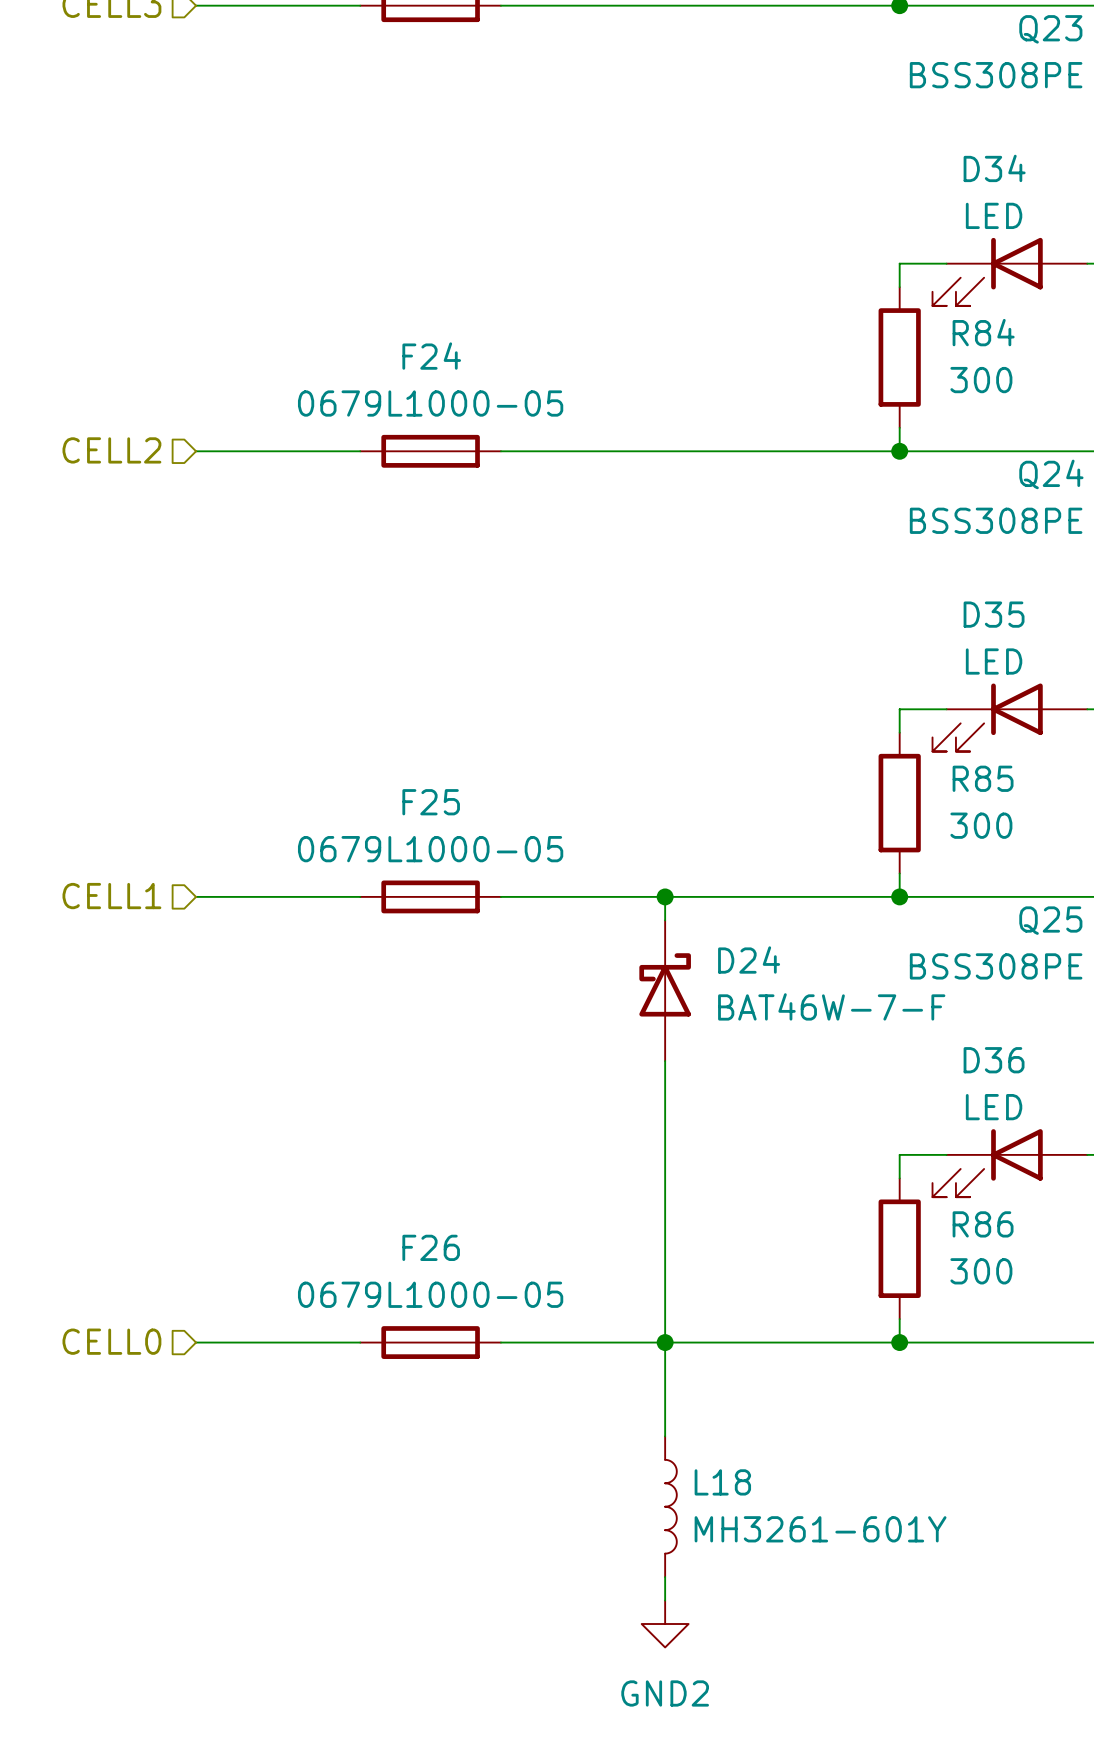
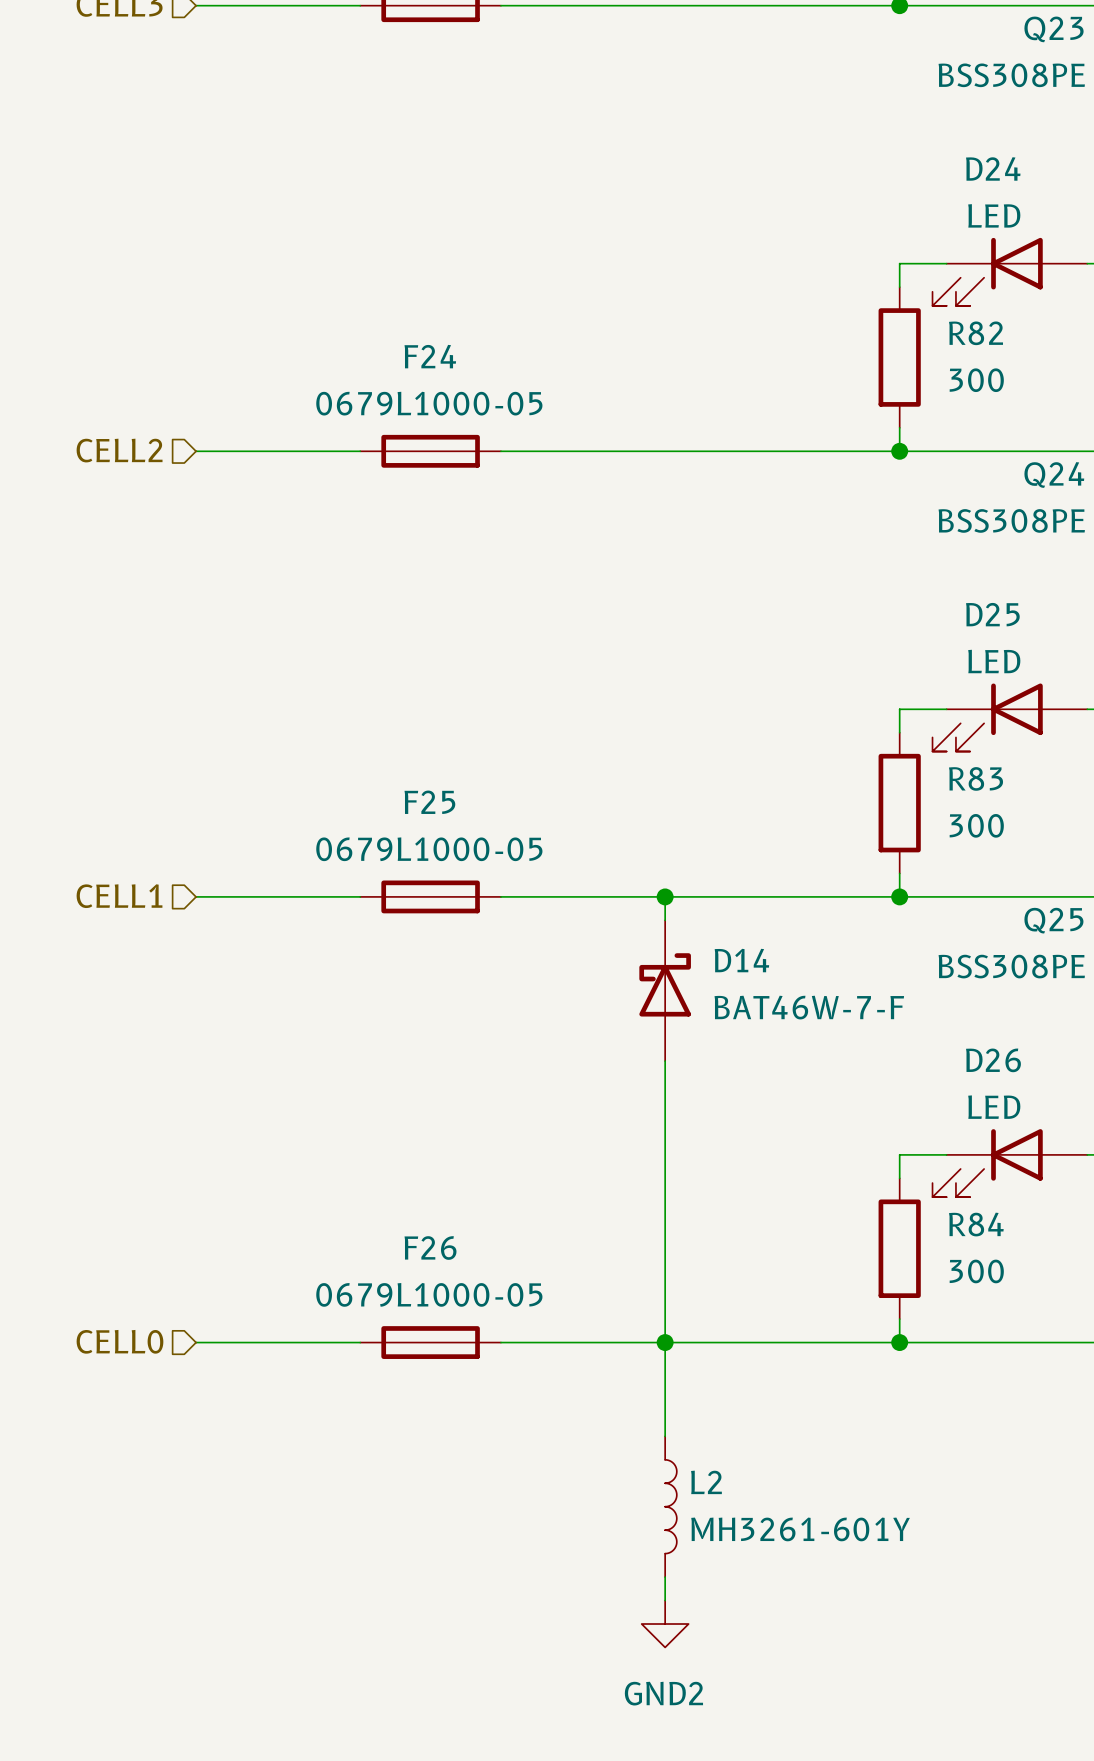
D34 name: D34 (994, 168) -> D24 (993, 168)
R84 name: R84 (983, 332) -> R82 (975, 333)
D35 name: D35 (994, 614) -> D25 (992, 614)
R85 name: R85 (983, 778) -> R83 (976, 778)
D24 name: D24 (749, 959) -> D14 (741, 960)
D36 name: D36 (994, 1060) -> D26 (993, 1060)
R86 name: R86 (983, 1224) -> R84 (976, 1224)
L18 name: L18 (722, 1482) -> L2 (706, 1482)

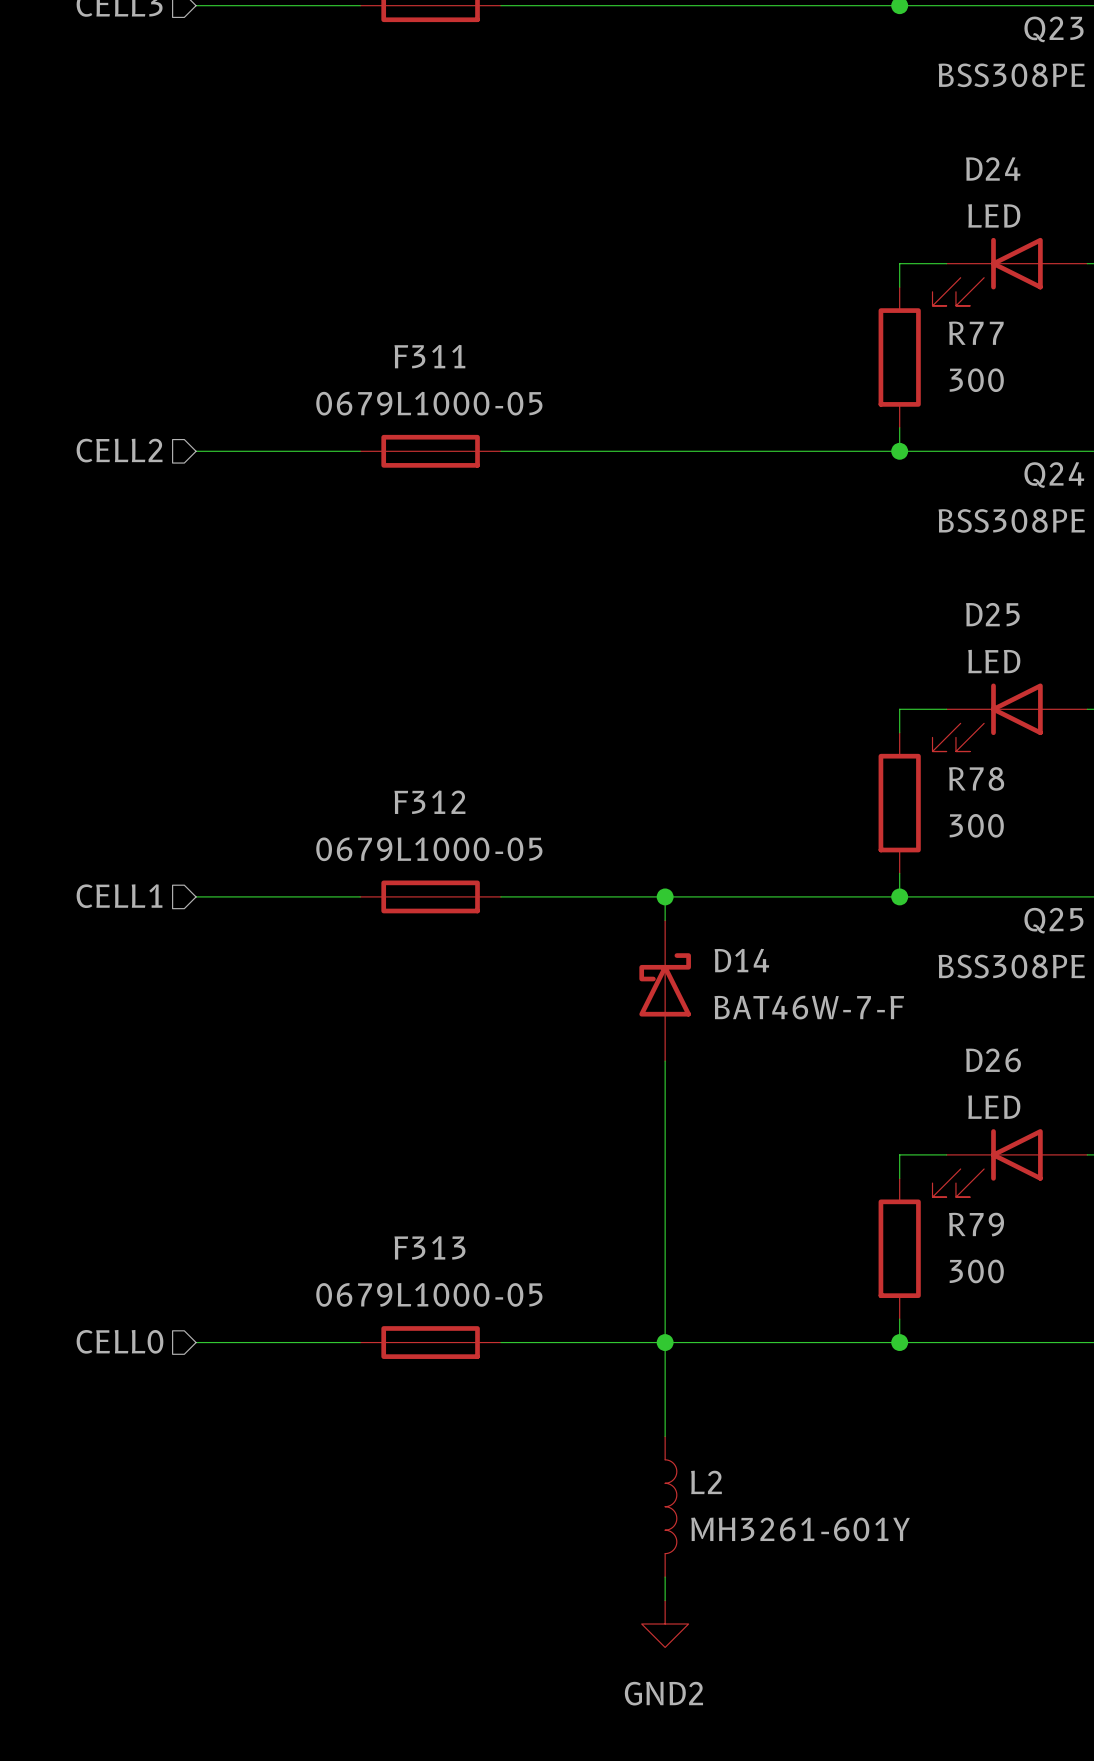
R82 name: R82 (975, 333) -> R77 (976, 333)
F24 name: F24 (430, 356) -> F311 (429, 356)
R83 name: R83 (976, 778) -> R78 (976, 778)
F25 name: F25 (429, 802) -> F312 (429, 802)
R84 name: R84 (976, 1224) -> R79 (976, 1224)
F26 name: F26 (430, 1248) -> F313 (429, 1247)

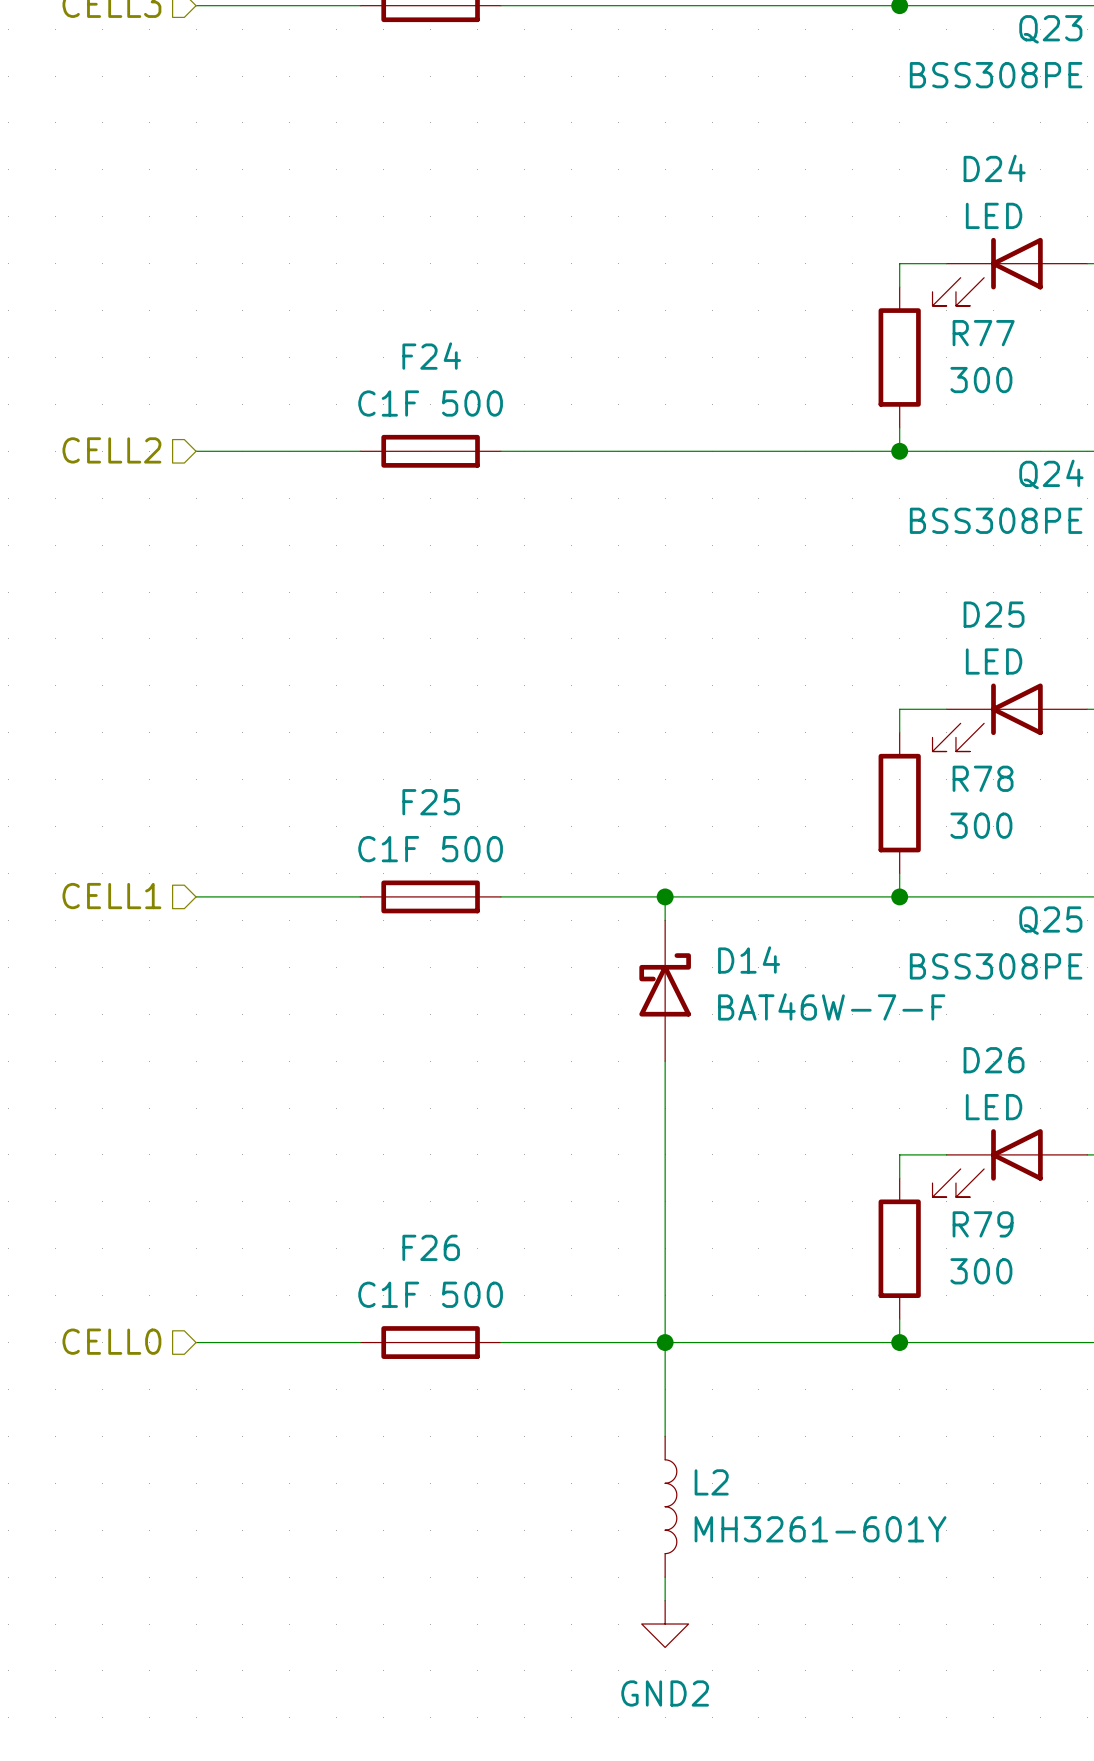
F311 name: F311 (429, 356) -> F24 (431, 356)
F311 value: 0679L1000-05 (429, 403) -> C1F 500 (430, 403)
F312 name: F312 (429, 802) -> F25 (431, 802)
F312 value: 0679L1000-05 (429, 849) -> C1F 500 (430, 849)
F313 name: F313 (429, 1247) -> F26 (431, 1247)
F313 value: 0679L1000-05 (429, 1294) -> C1F 500 (430, 1294)

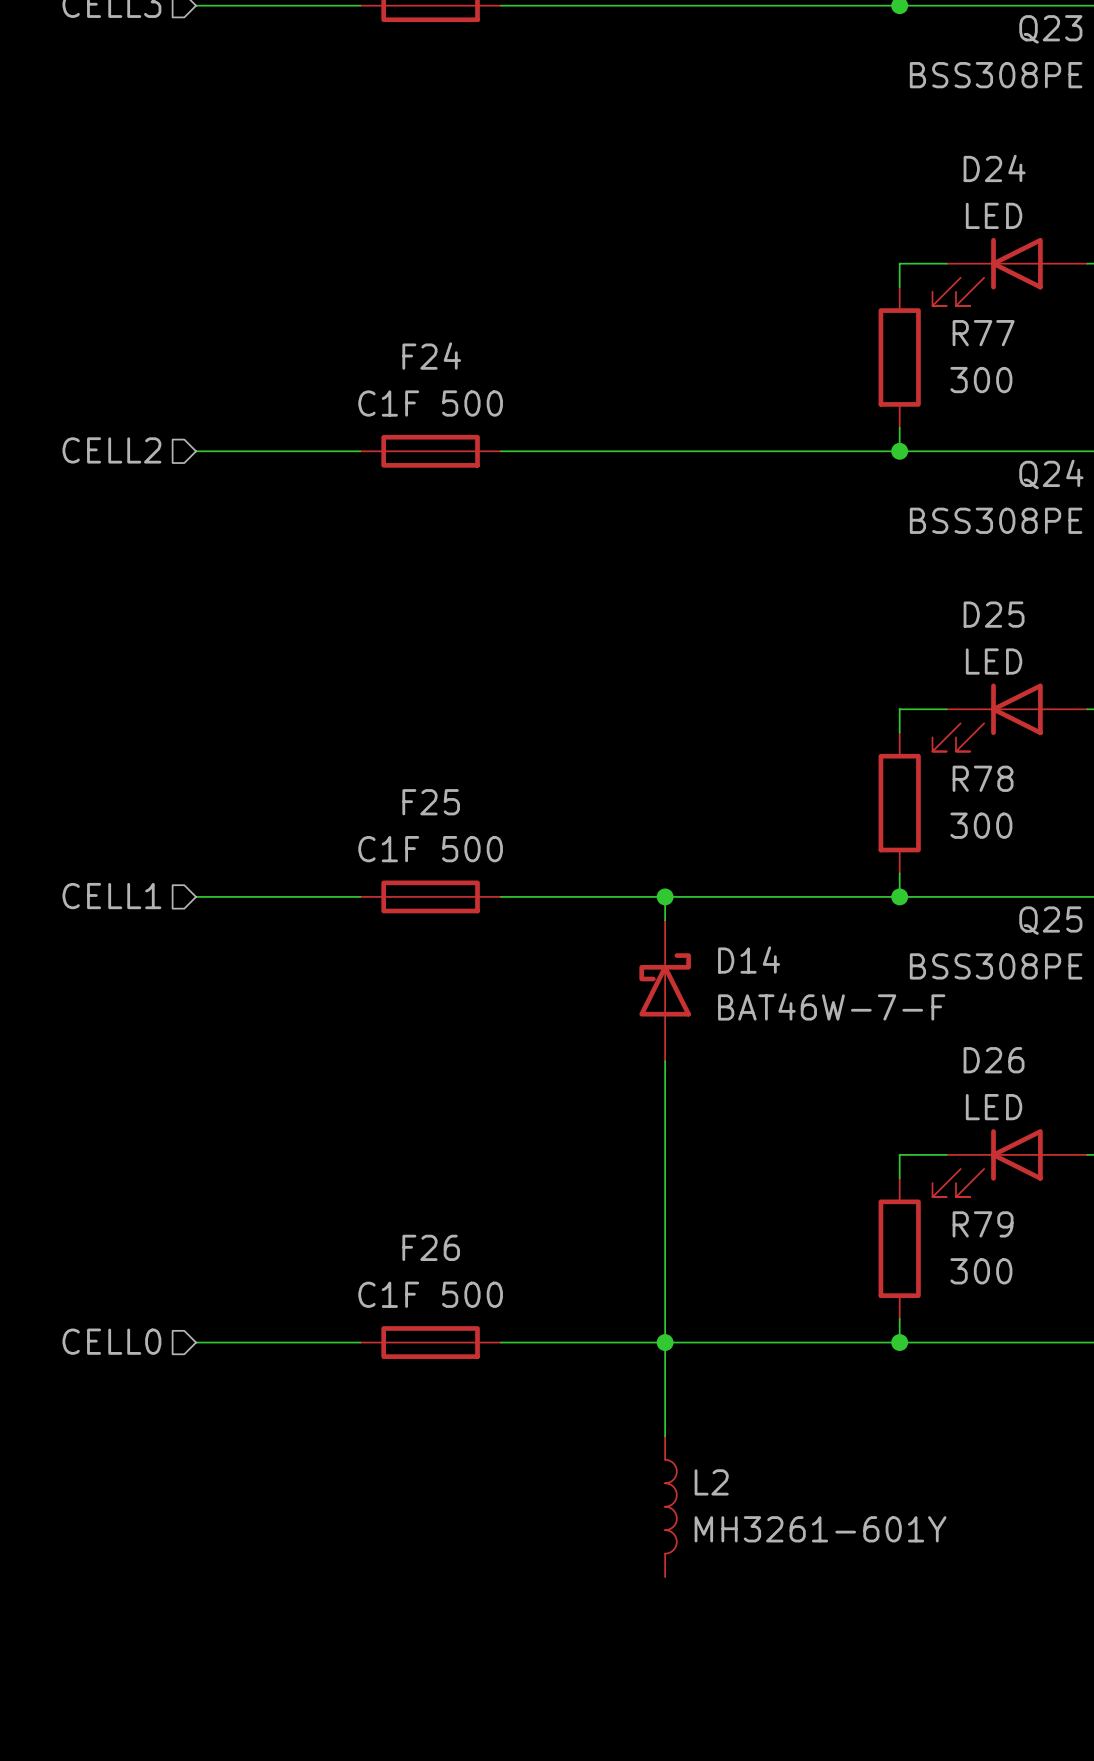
wire: (665, 1577) (665, 1600) -> none
power symbol: GND2 (665, 1624) -> none

